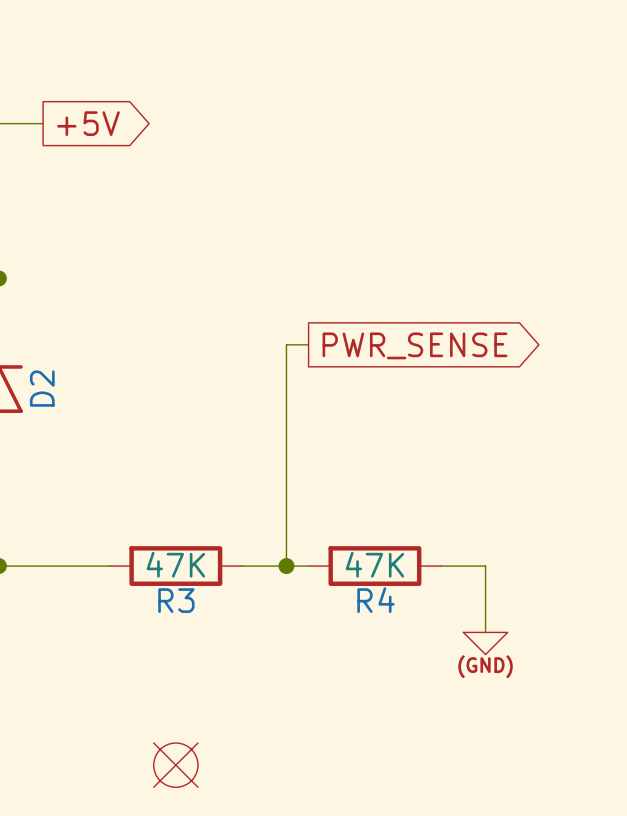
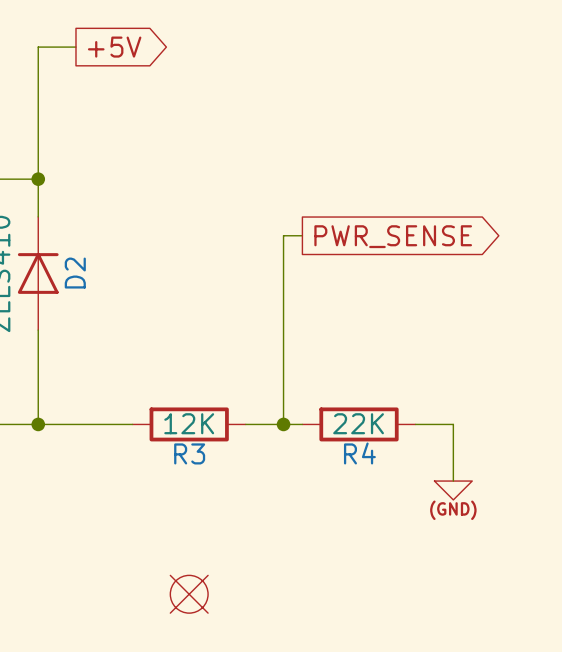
R3 value: 47K (175, 564) -> 12K (189, 423)
R4 value: 47K (374, 564) -> 22K (358, 423)

